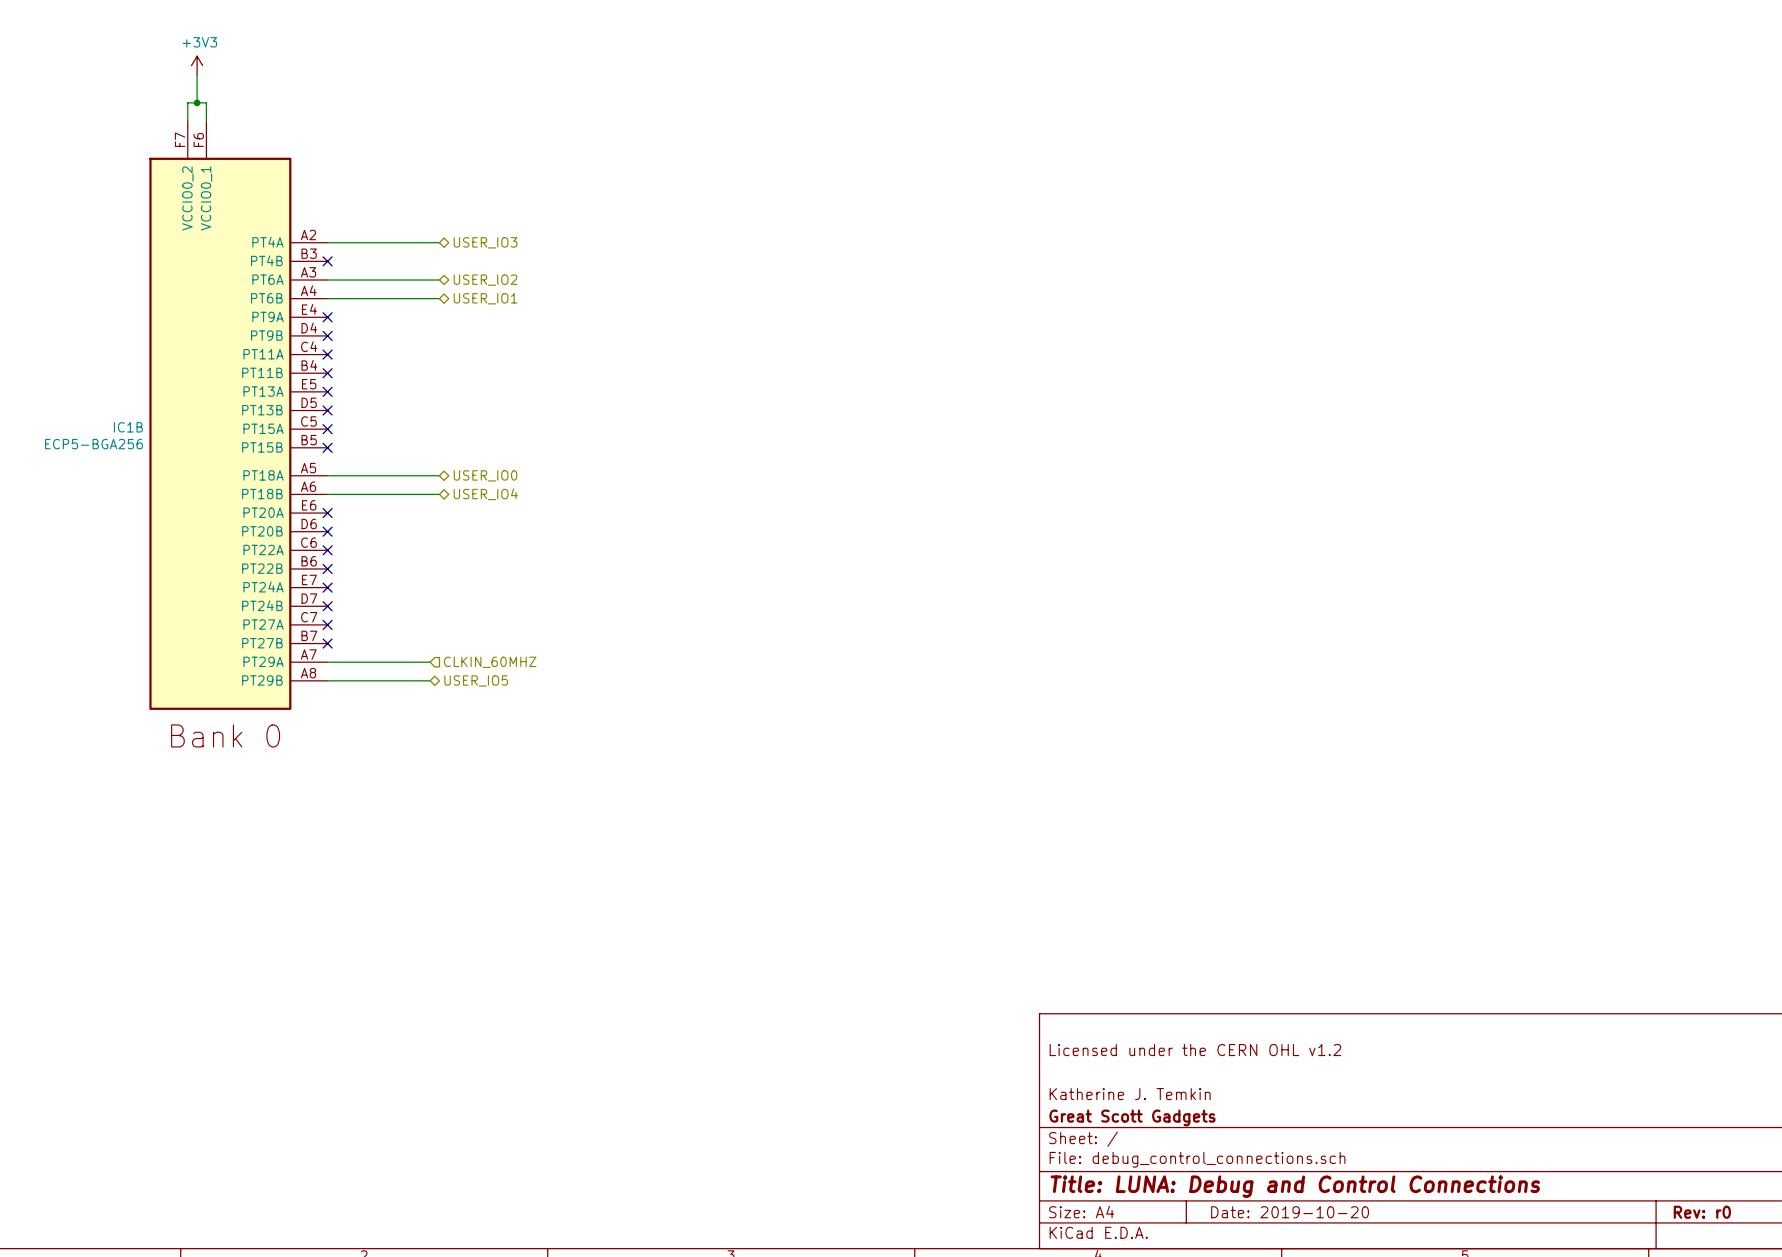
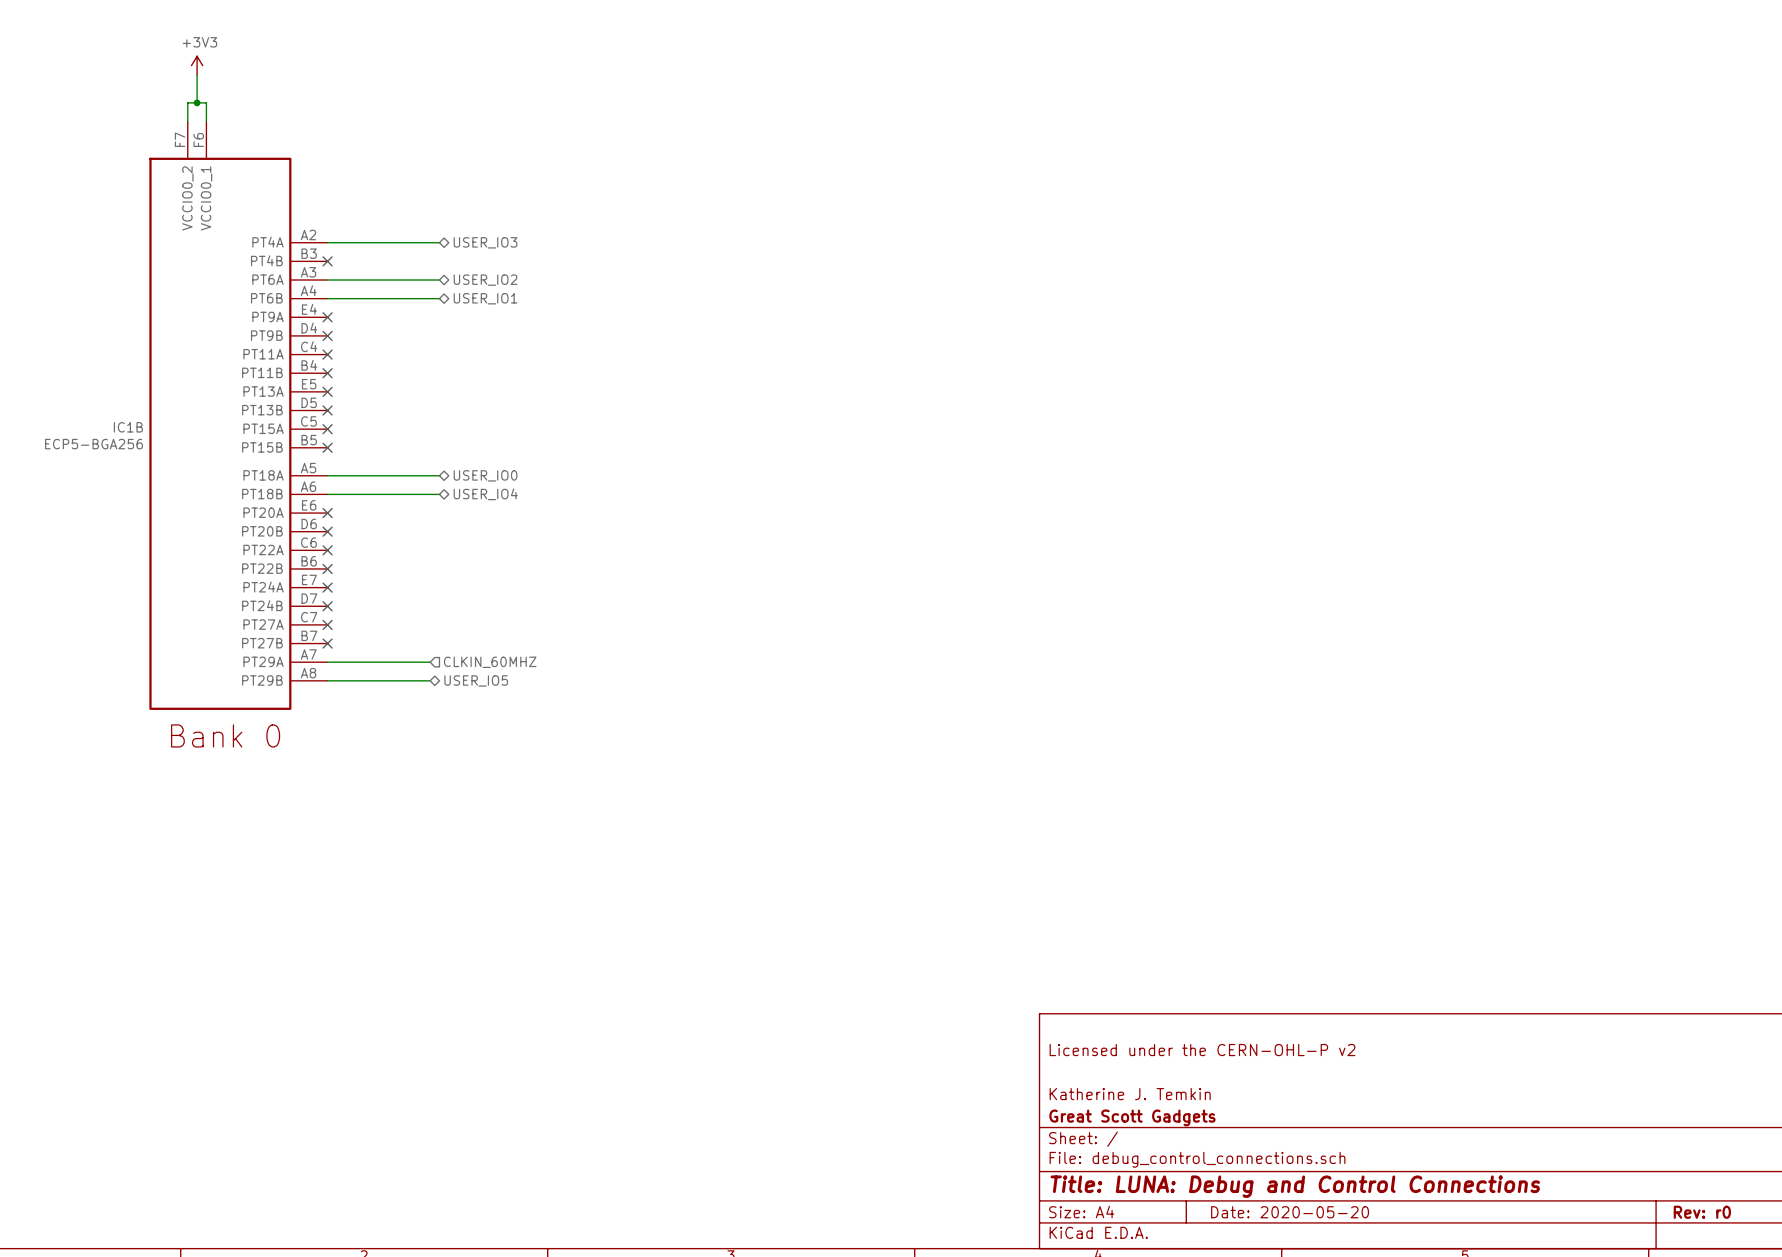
title block: Licensed under the CERN OHL v1.2 (1195, 1050) -> Licensed under the CERN-OHL-P v2 (1202, 1050)
title block: Date: 2019-10-20 (1290, 1212) -> Date: 2020-05-20 (1290, 1212)

